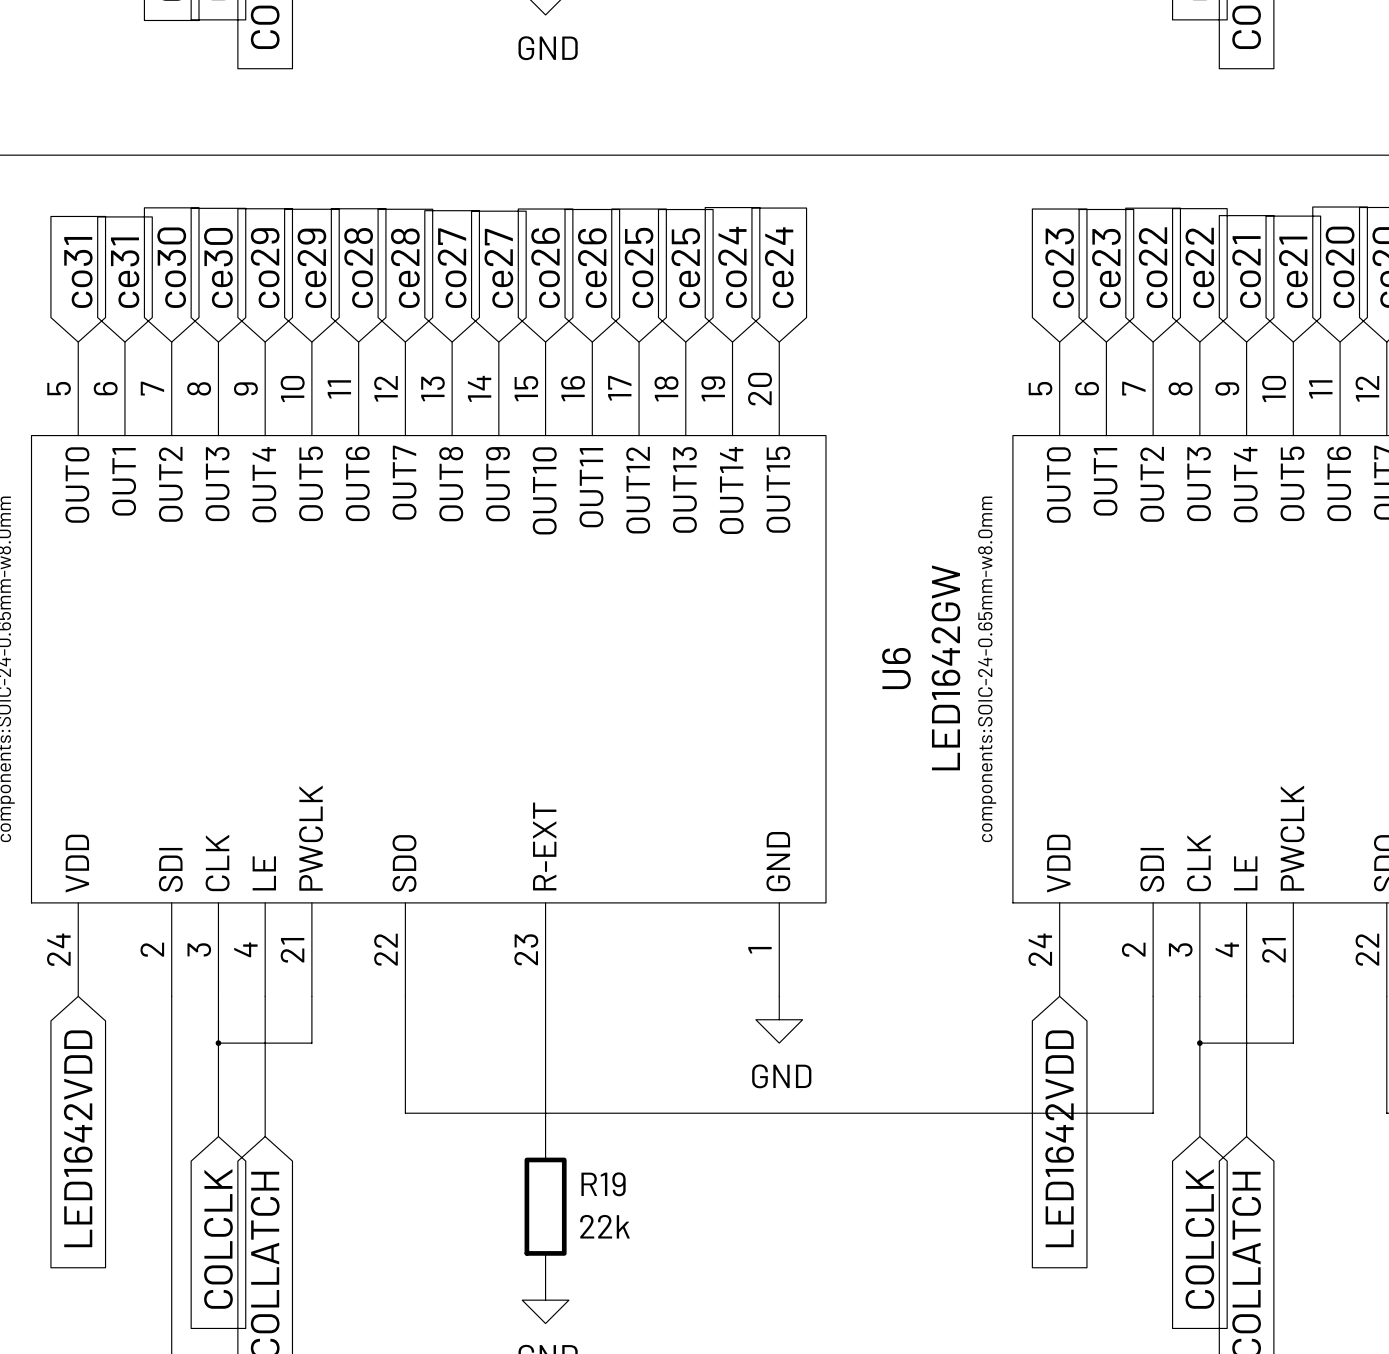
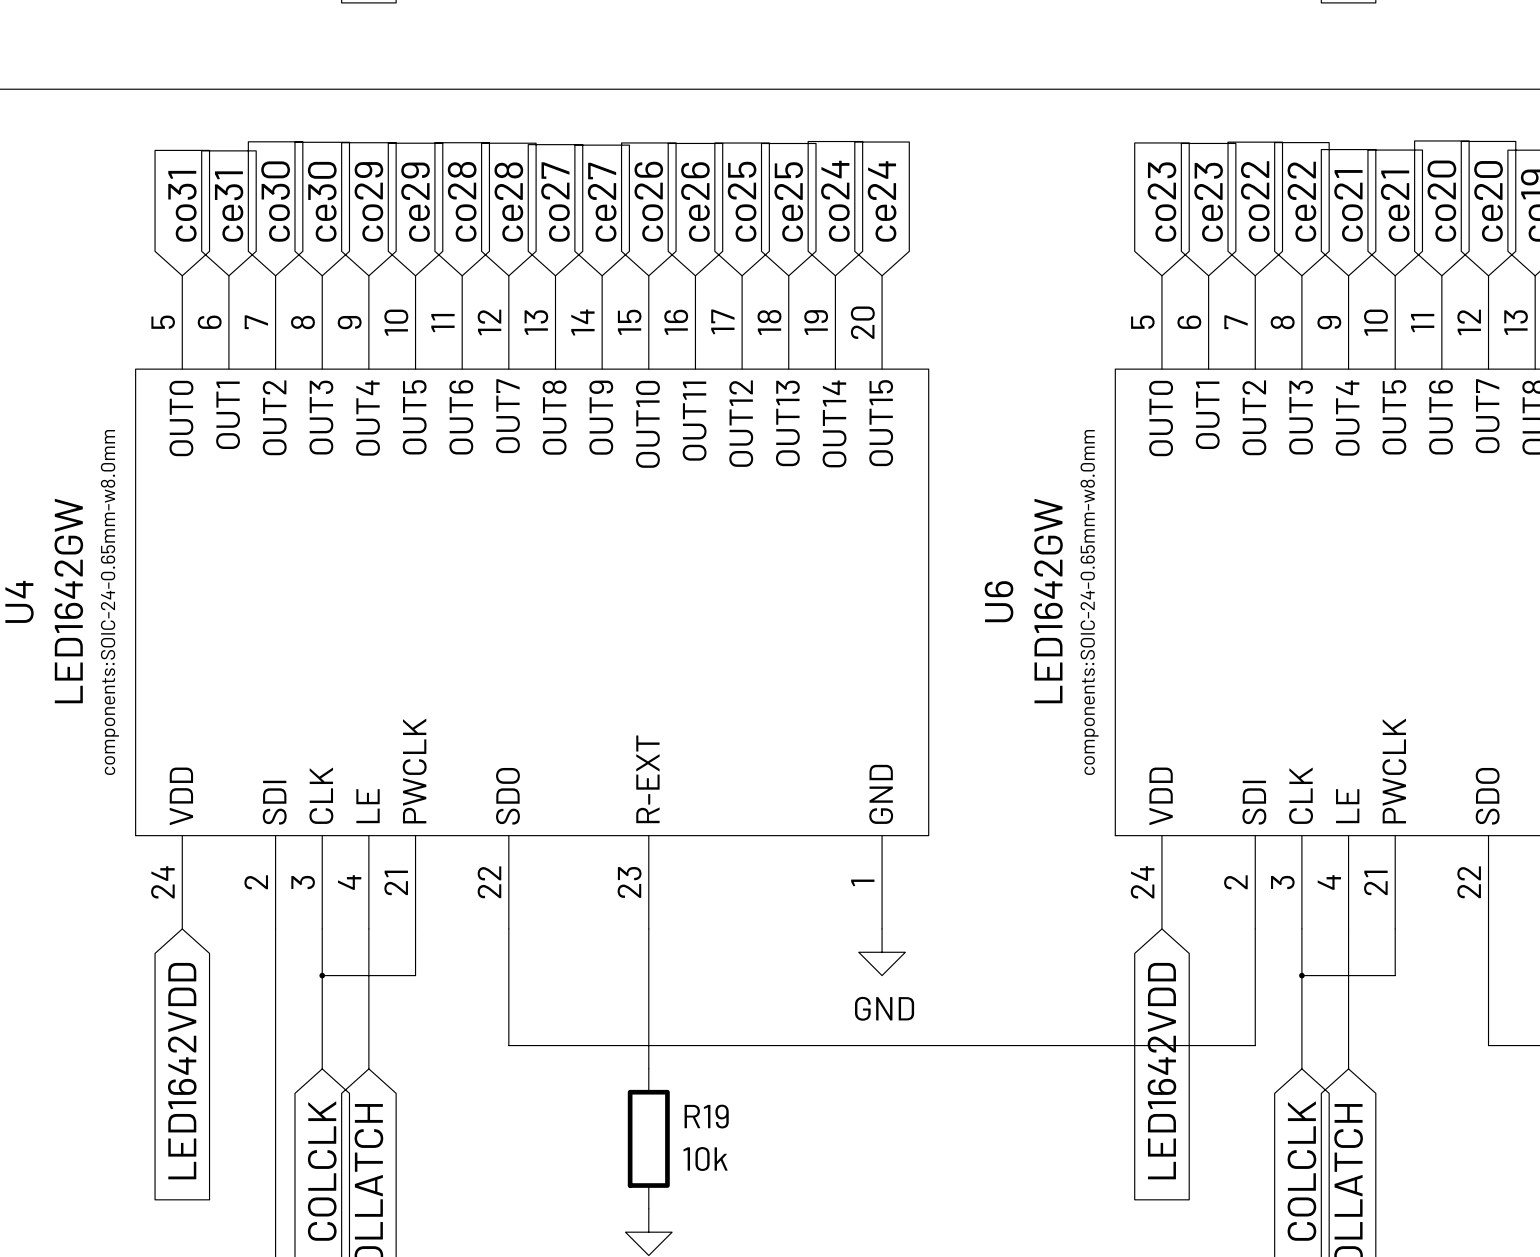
R19 value: 22k (605, 1226) -> 10k (705, 1159)

